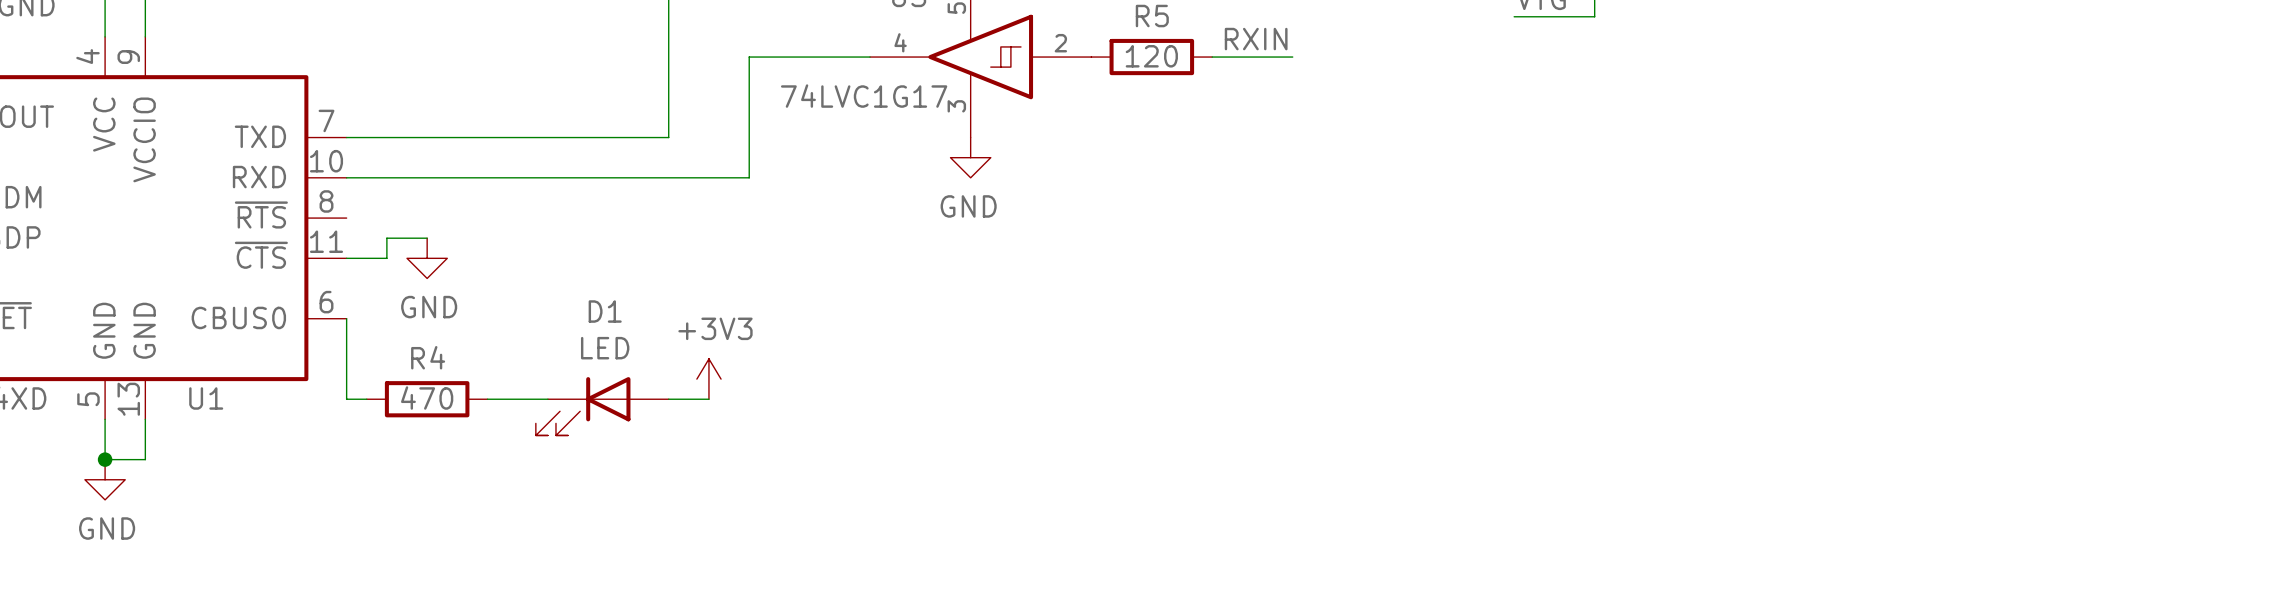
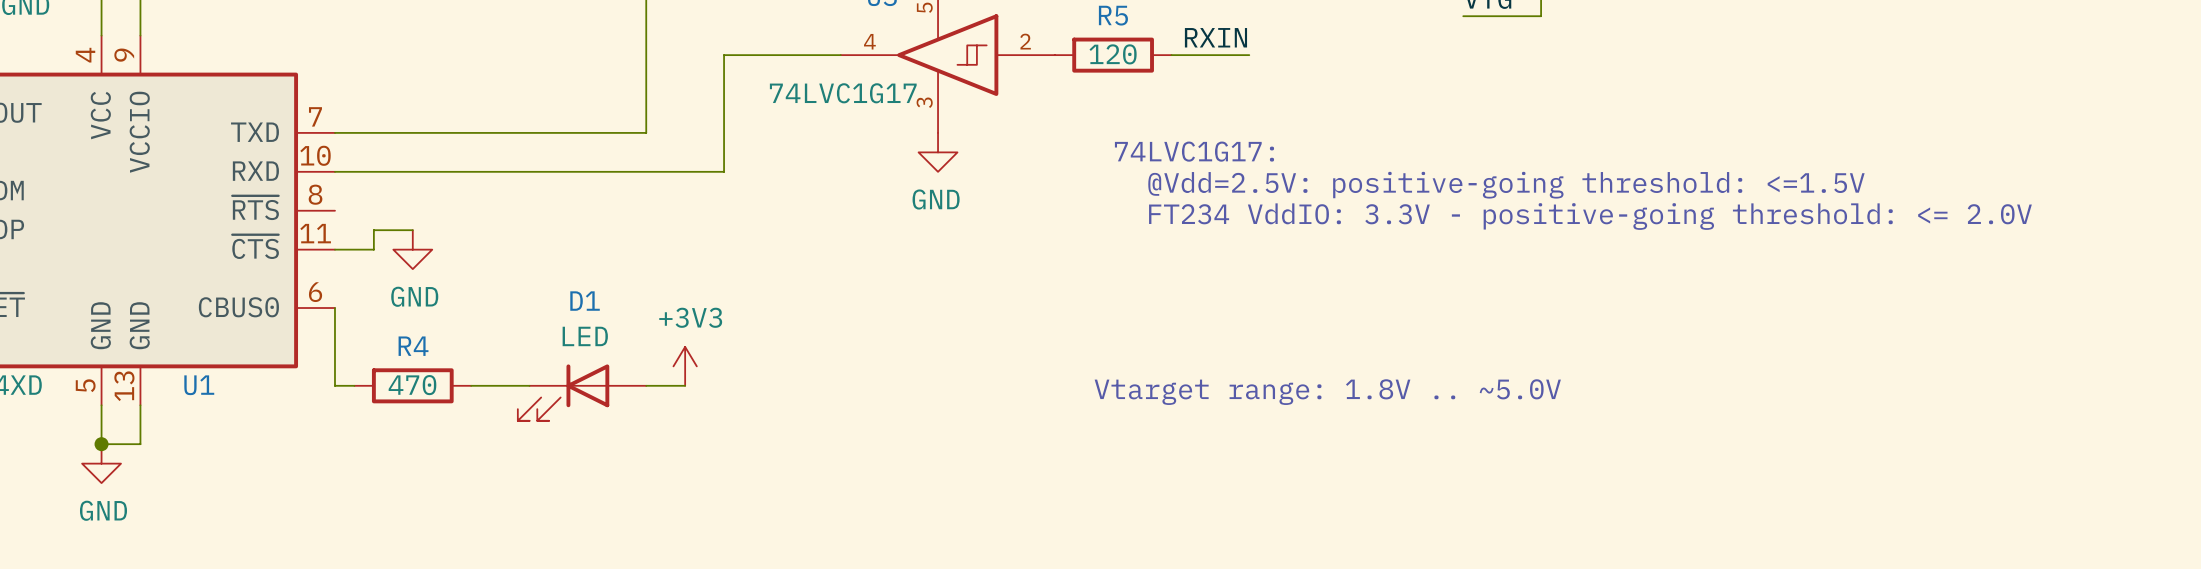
text: none -> 74LVC1G17: (1194, 151)
text: none -> @Vdd=2.5V: positive-going threshold: <=1.5V (1506, 185)
text: none -> FT234 VddIO: 3.3V - positive-going threshold: <= 2.0V (1590, 216)
text: none -> Vtarget range: 1.8V .. ~5.0V (1327, 392)

